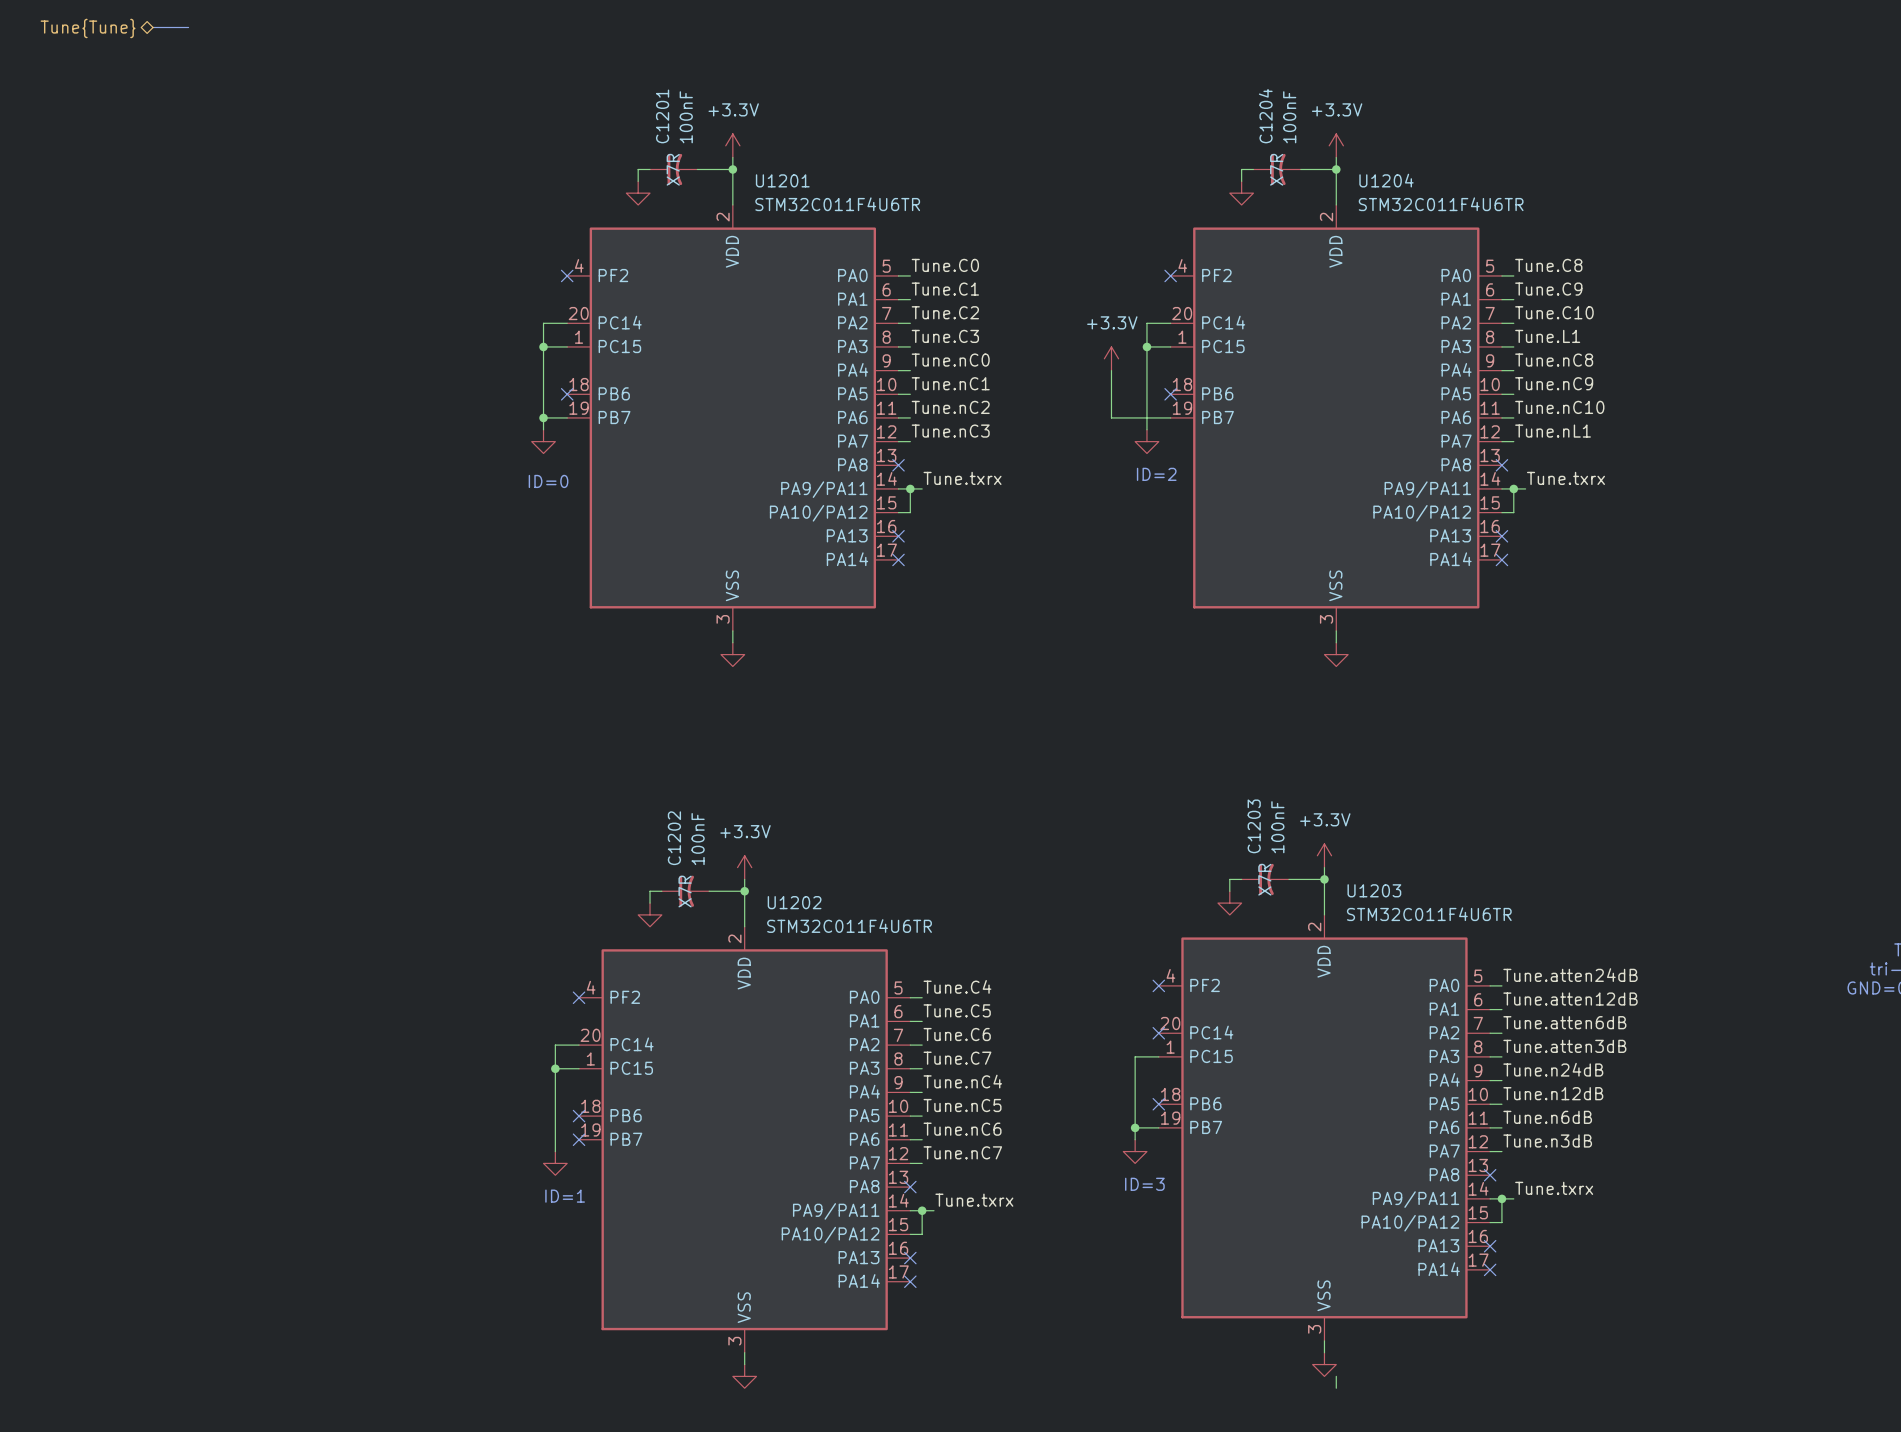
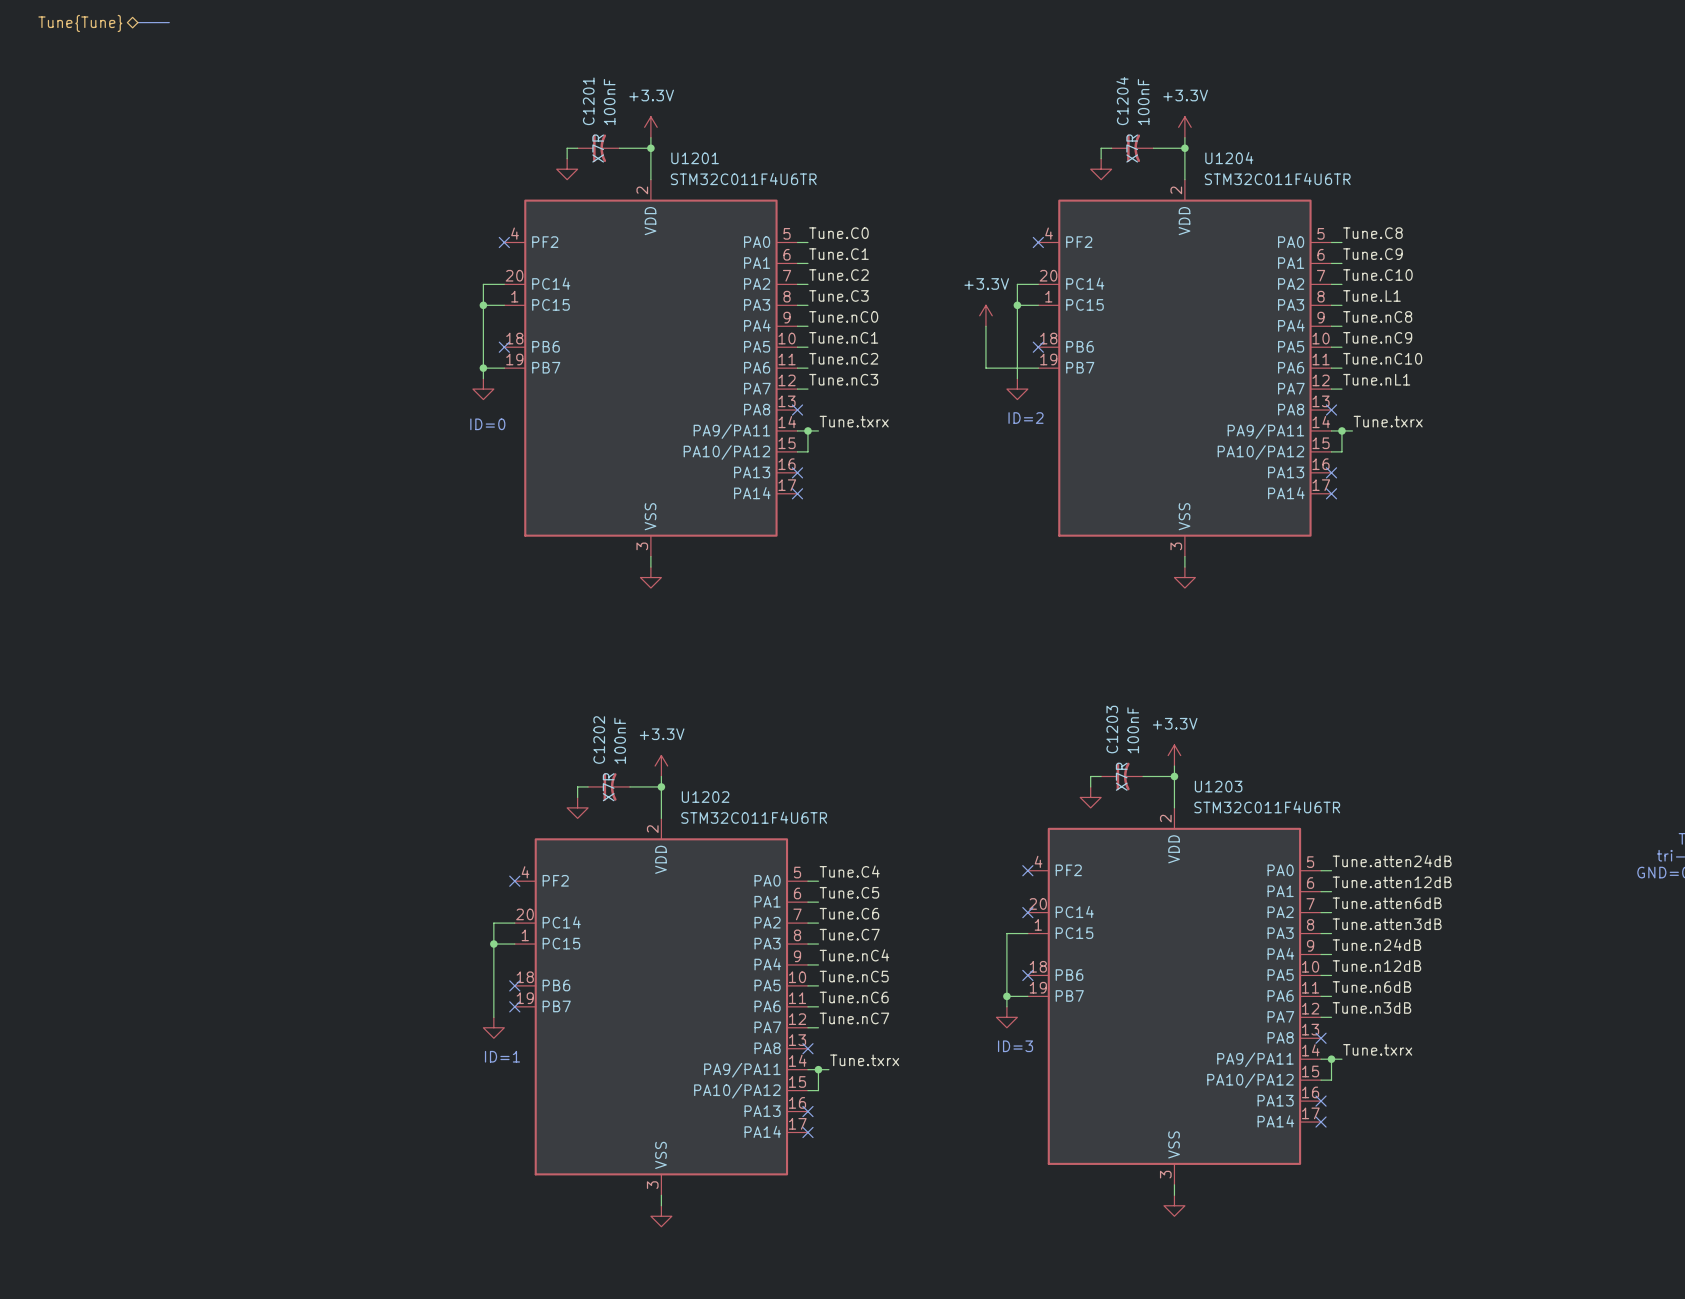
wire: (1336, 1376) (1336, 1388) -> none

